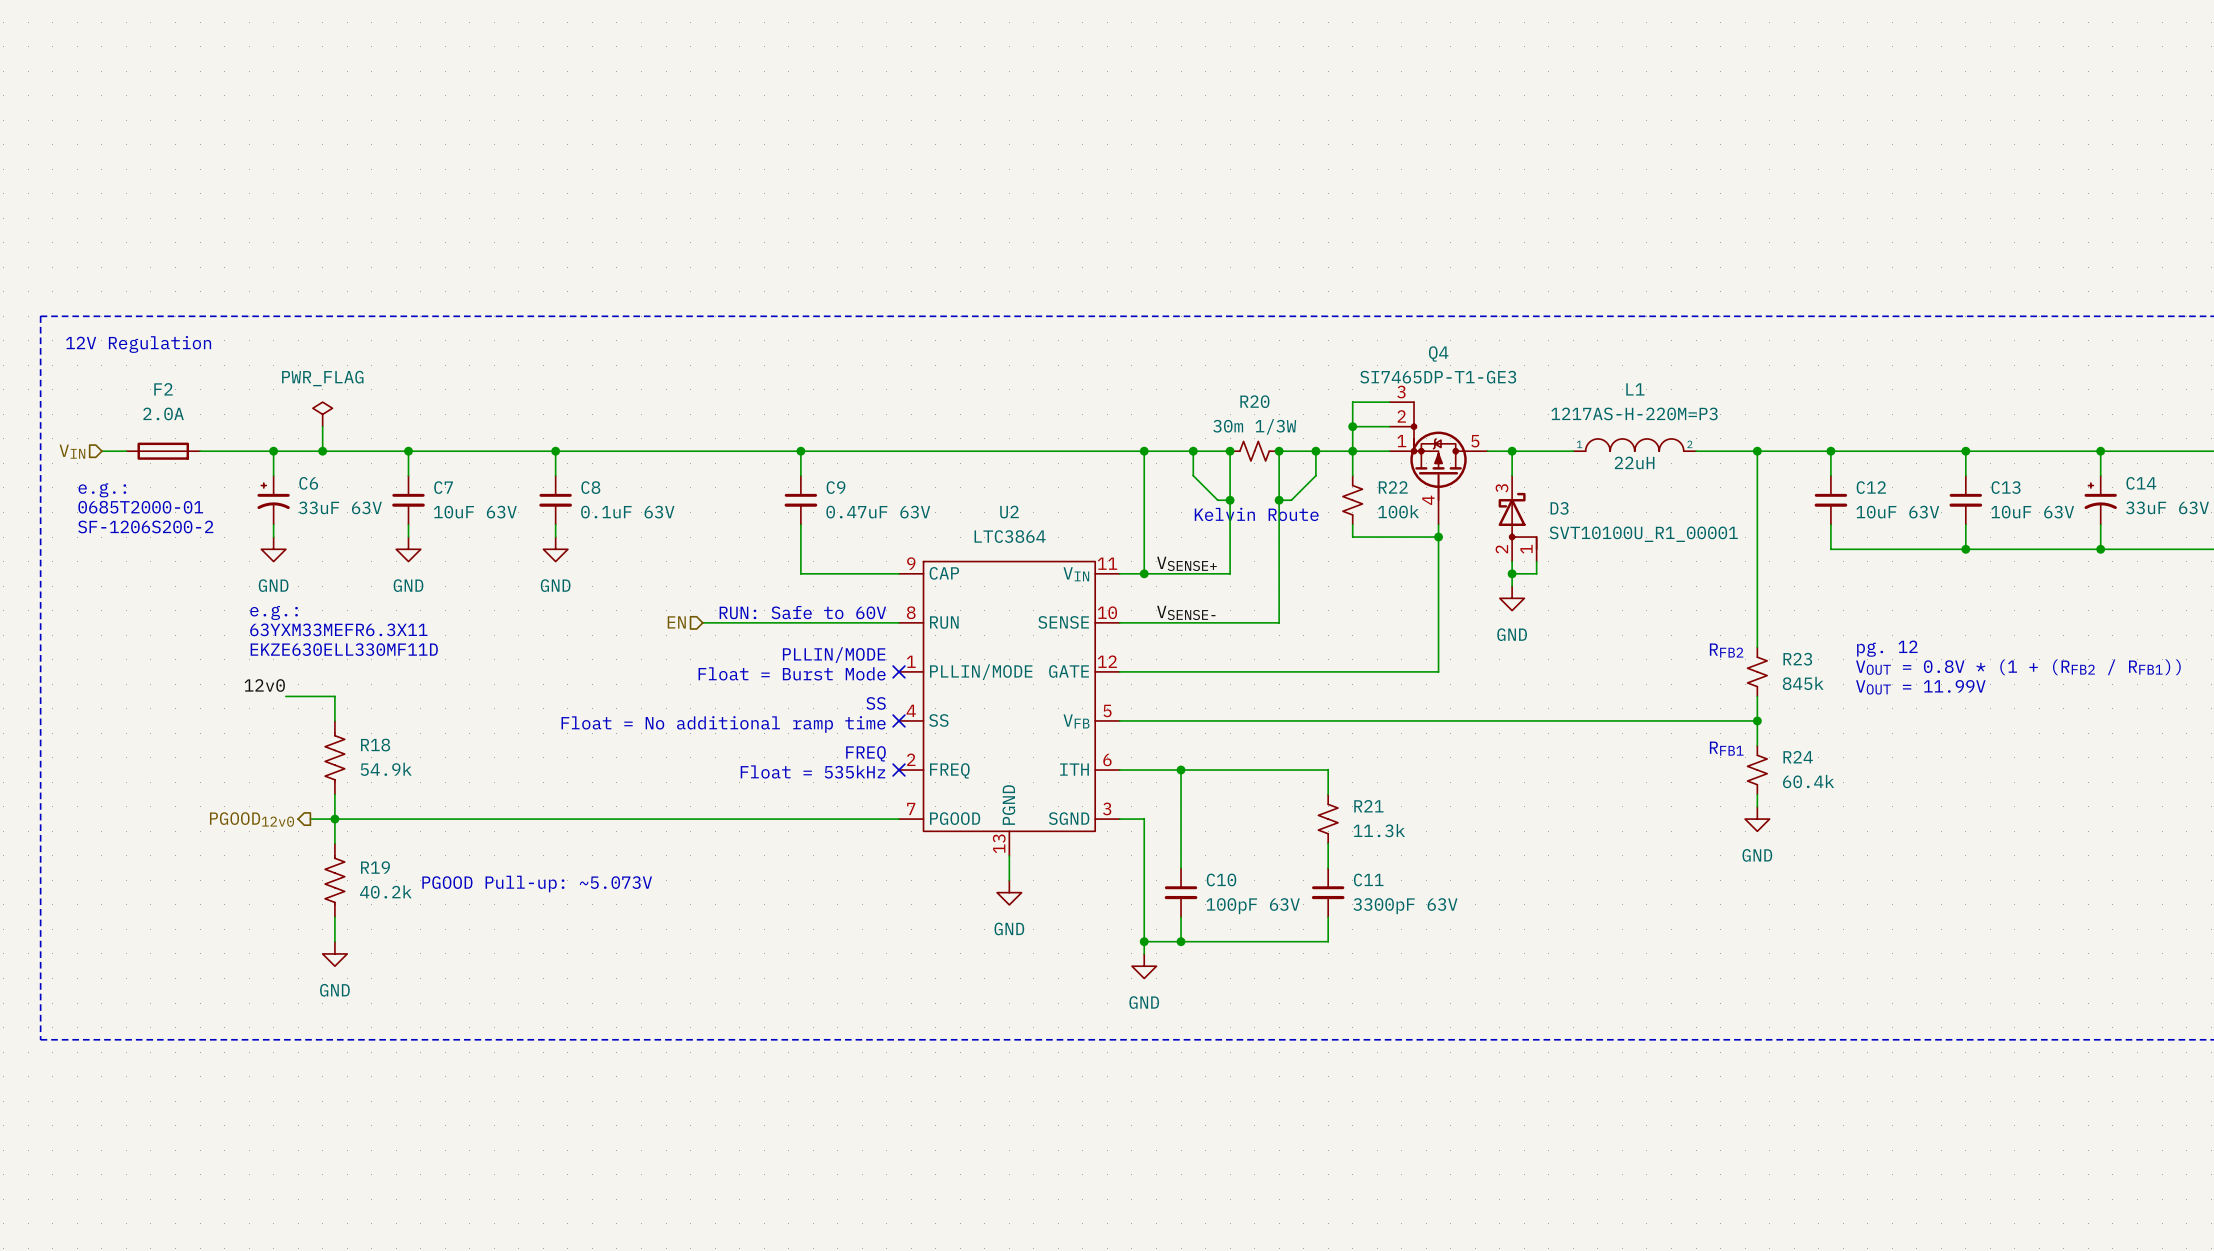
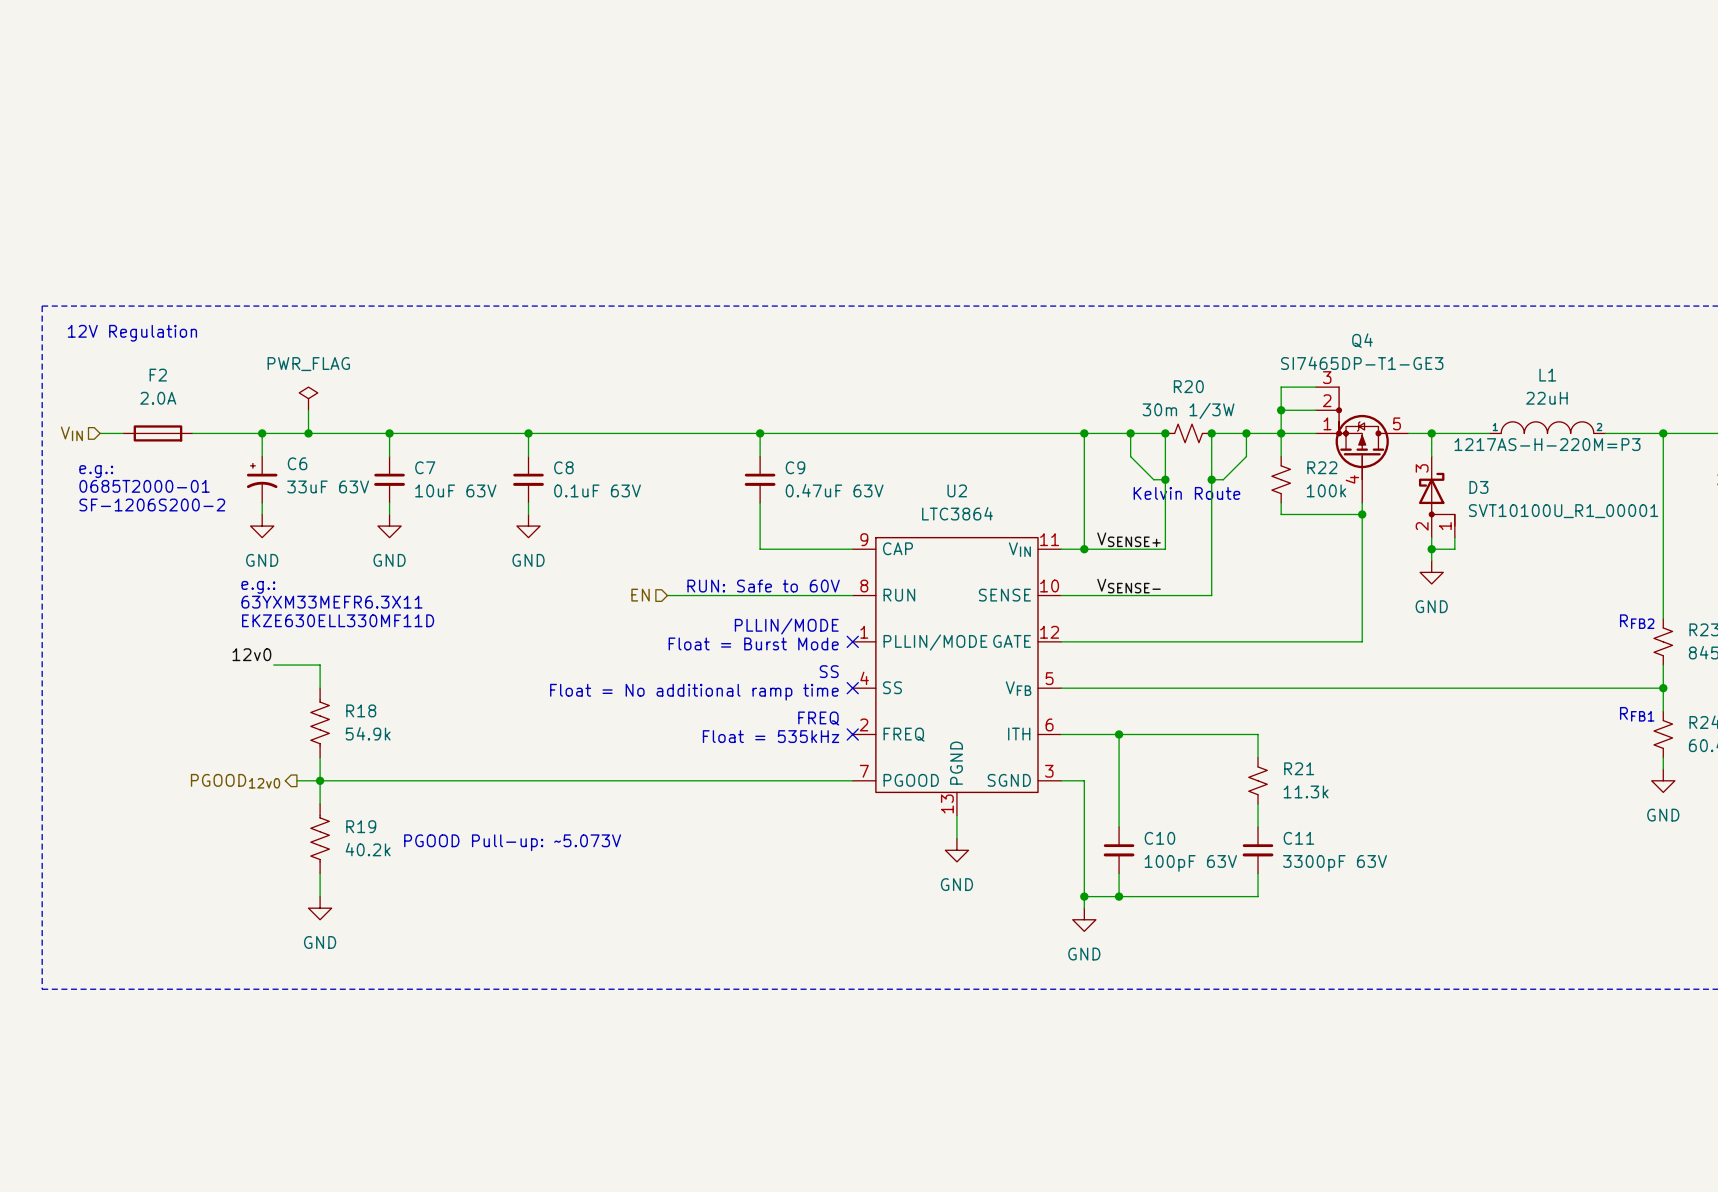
L1 value: 1217AS-H-220M=P3 (1634, 413) -> 22uH (1546, 398)
L1 text: 22uH (1634, 463) -> 1217AS-H-220M=P3 (1547, 444)

